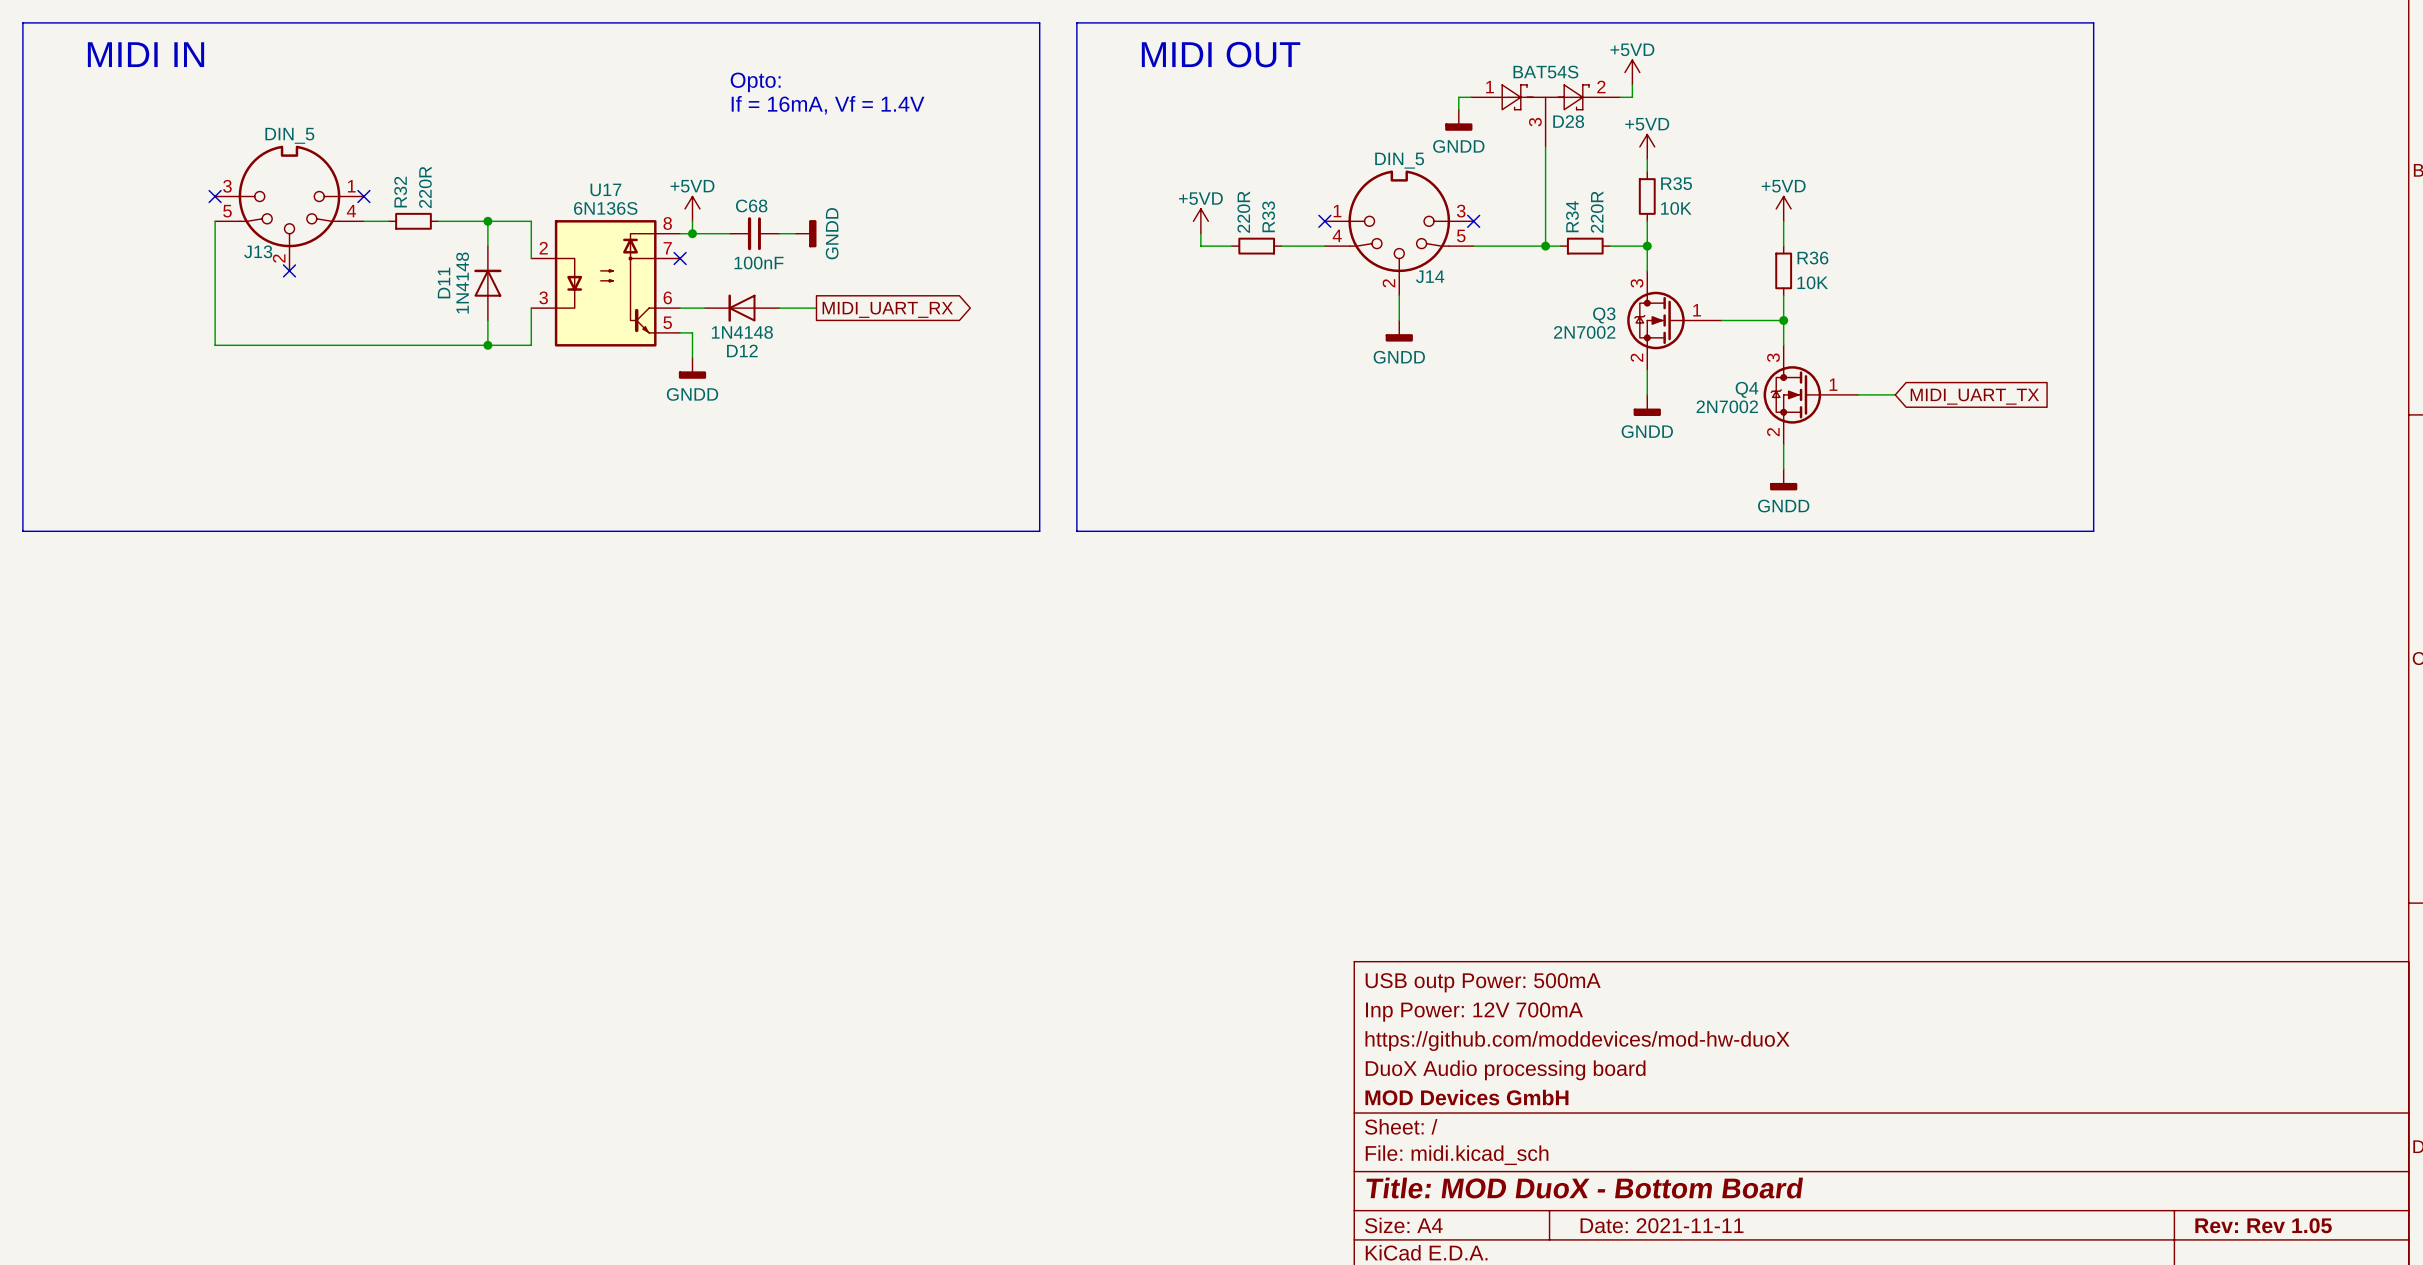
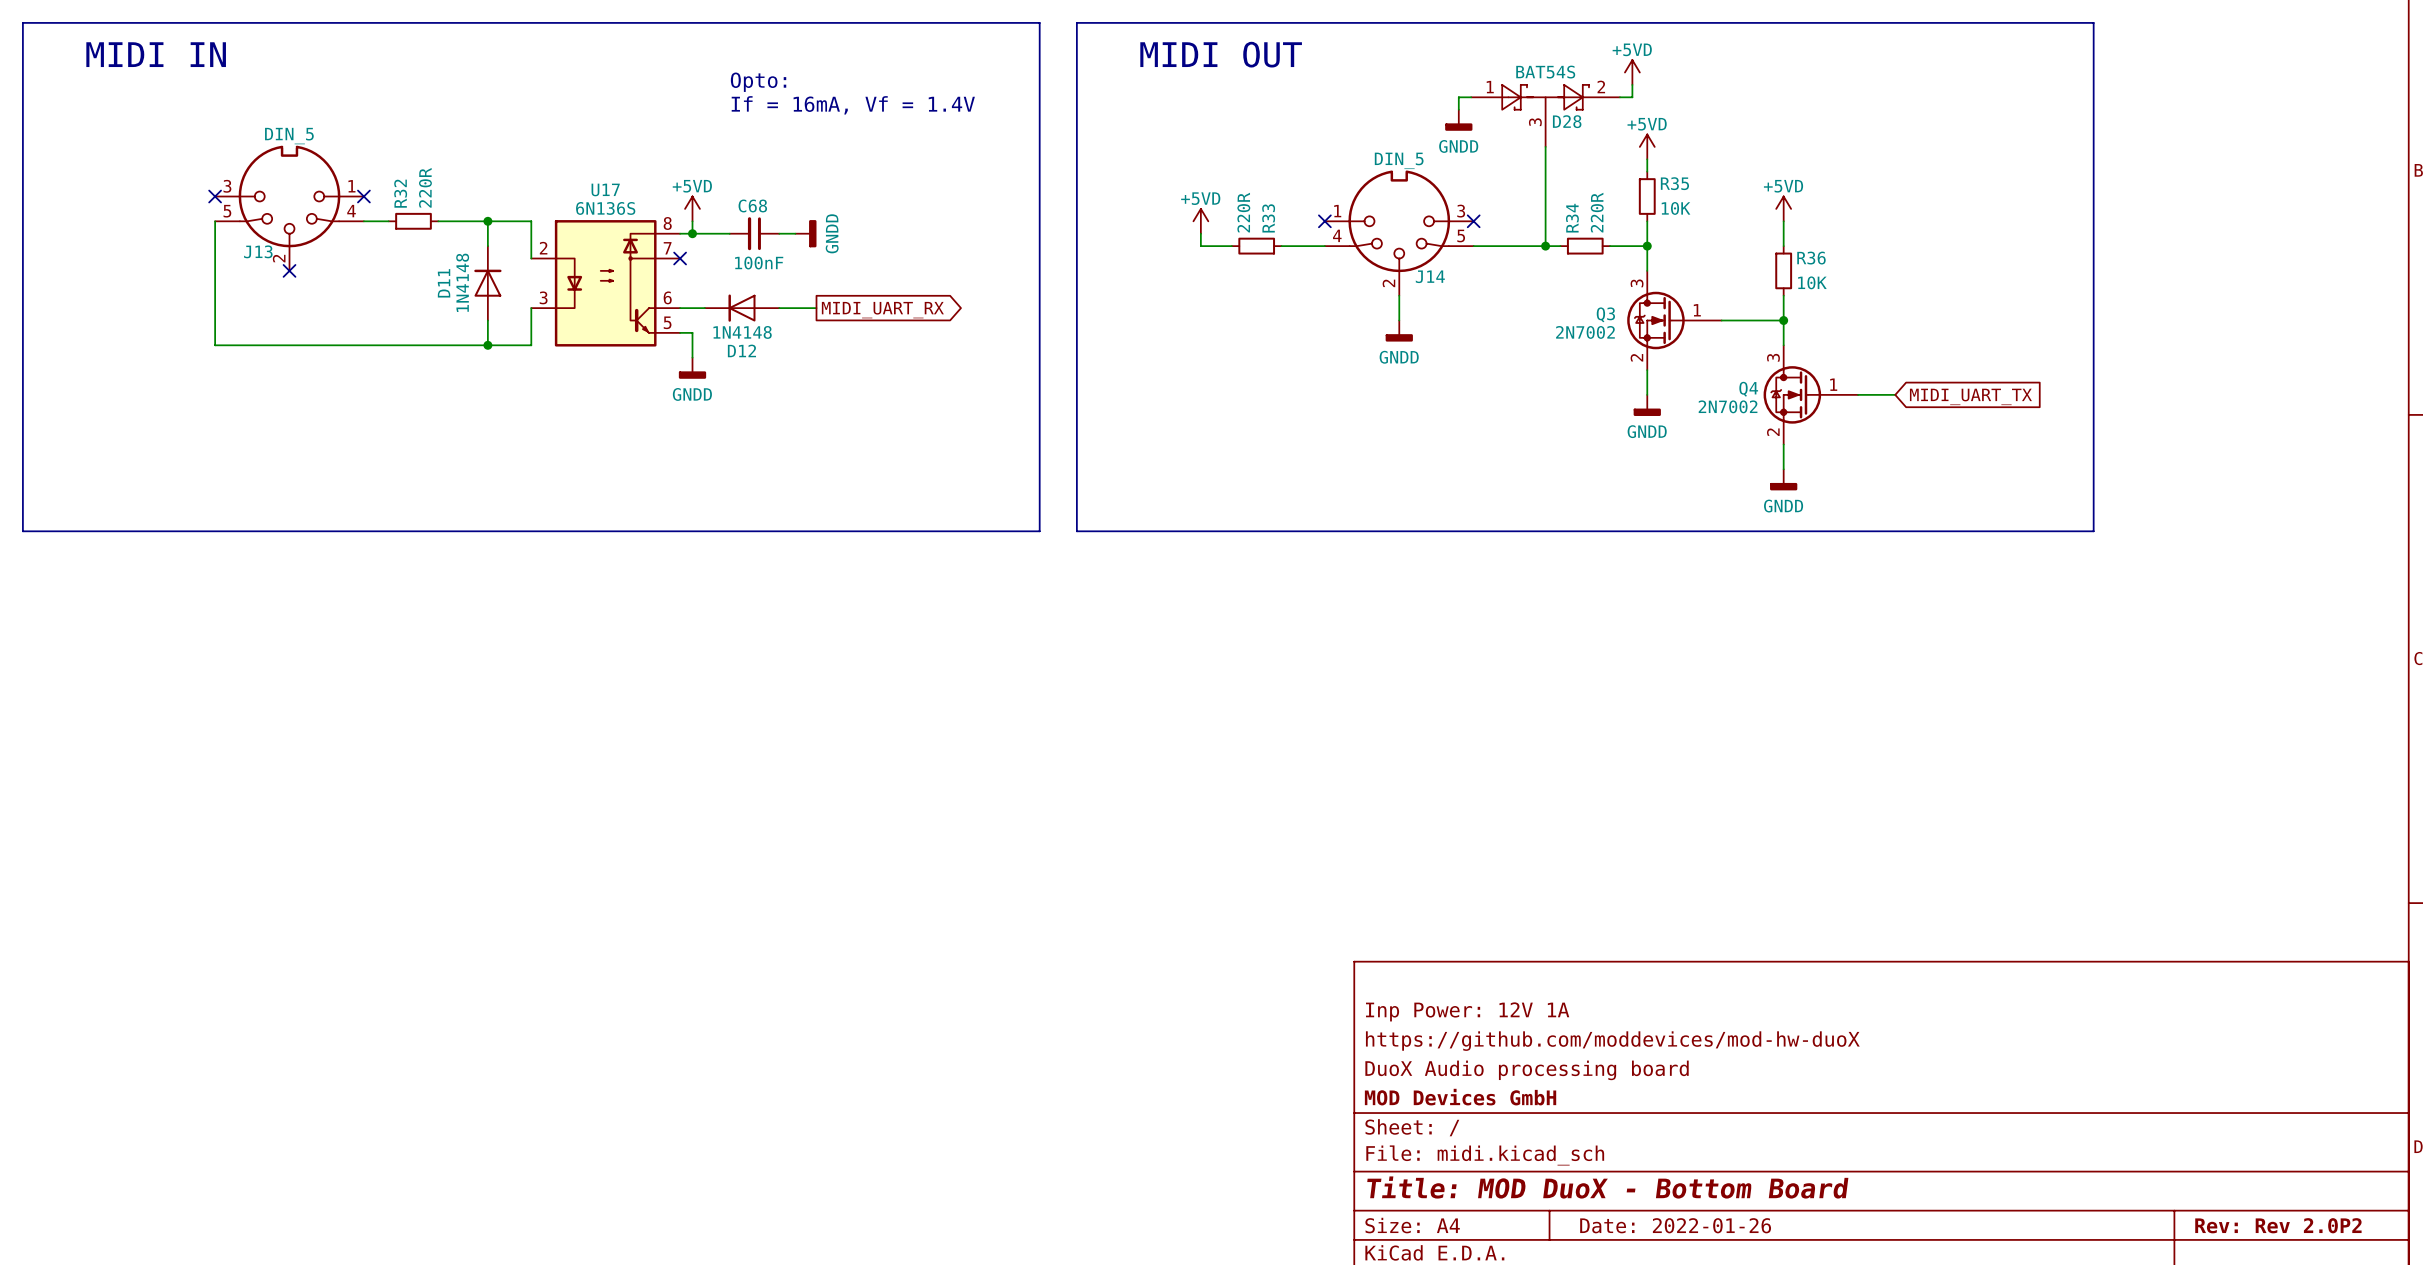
title block: USB outp Power: 500mA (1483, 982) -> none
title block: Inp Power: 12V 700mA (1474, 1012) -> Inp Power: 12V 1A (1467, 1011)
title block: Date: 2021-11-11 (1662, 1225) -> Date: 2022-01-26 (1675, 1225)
title block: Rev: Rev 1.05 (2263, 1225) -> Rev: Rev 2.0P2 (2278, 1225)

